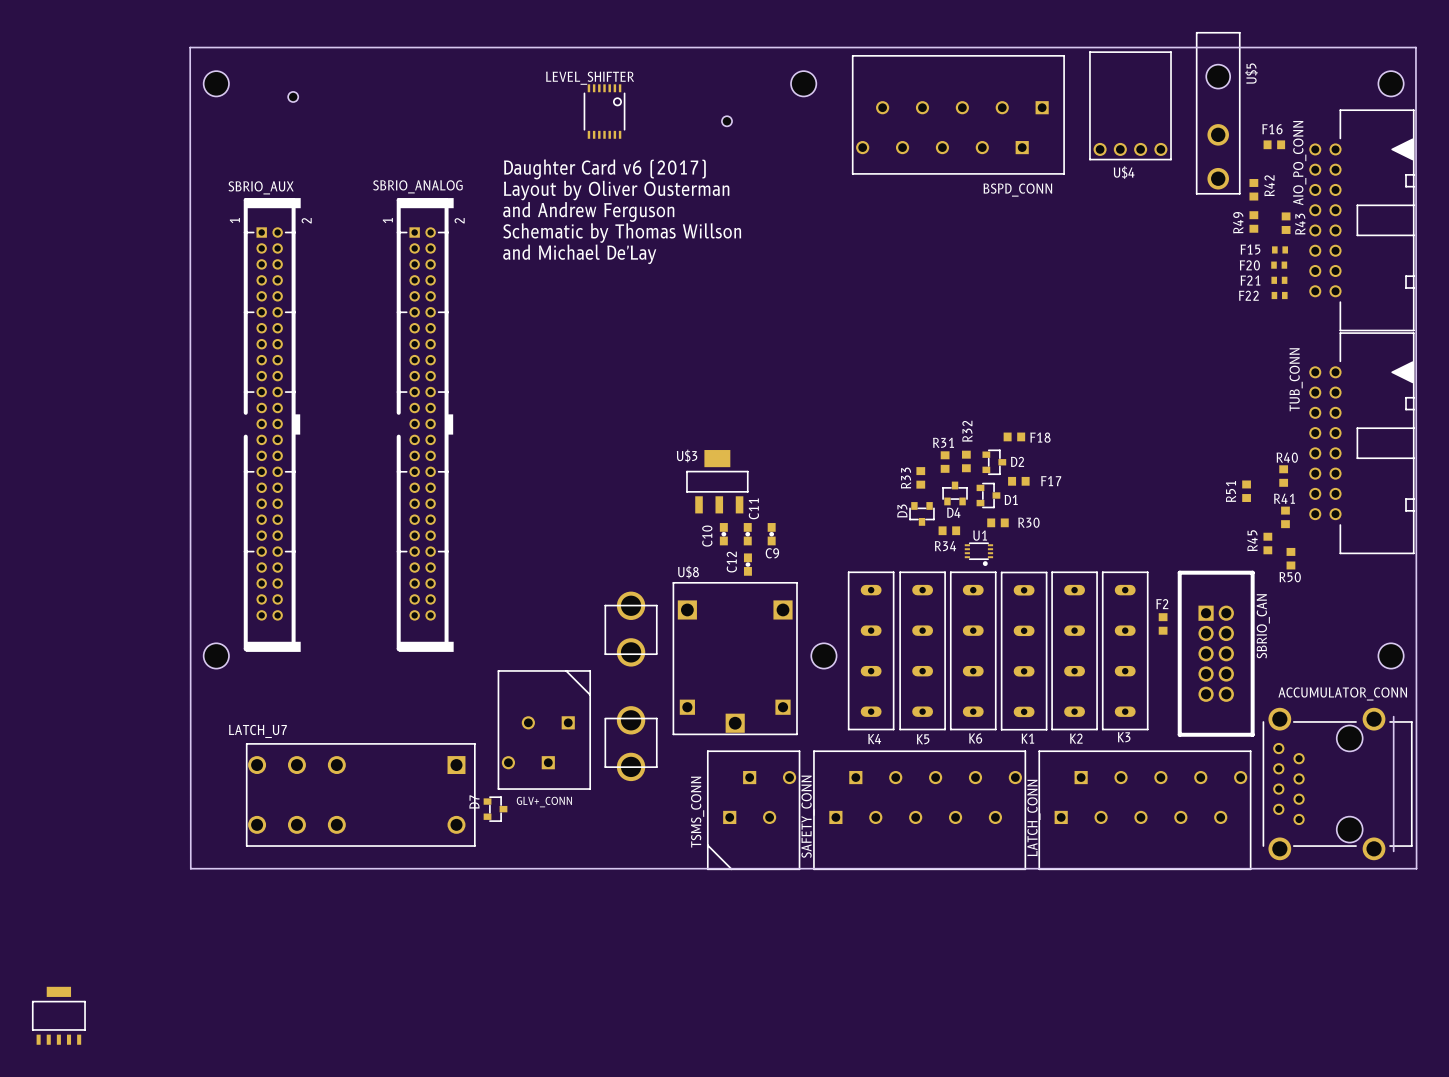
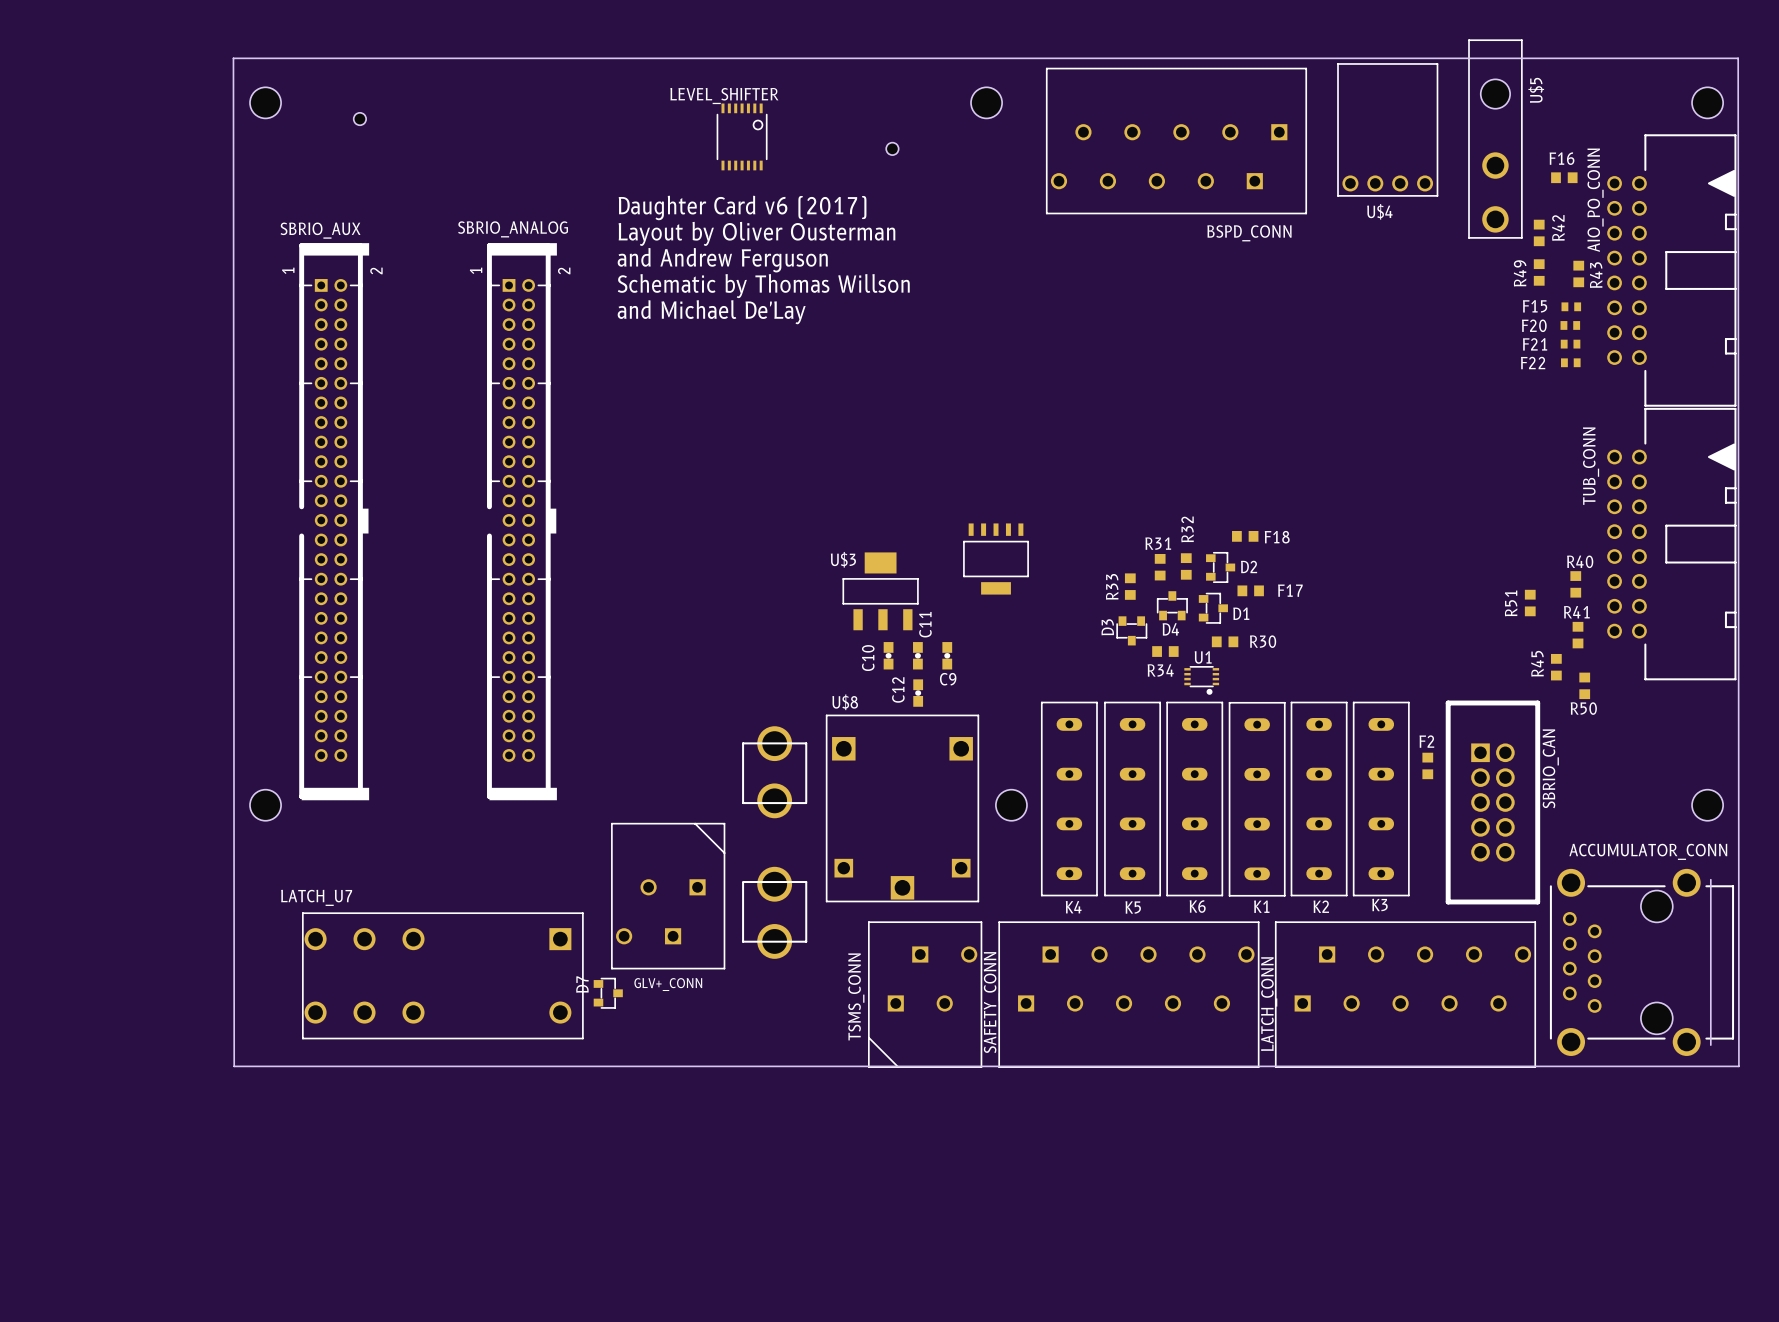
part: none -> (996, 559)
part: (58, 1015) -> none

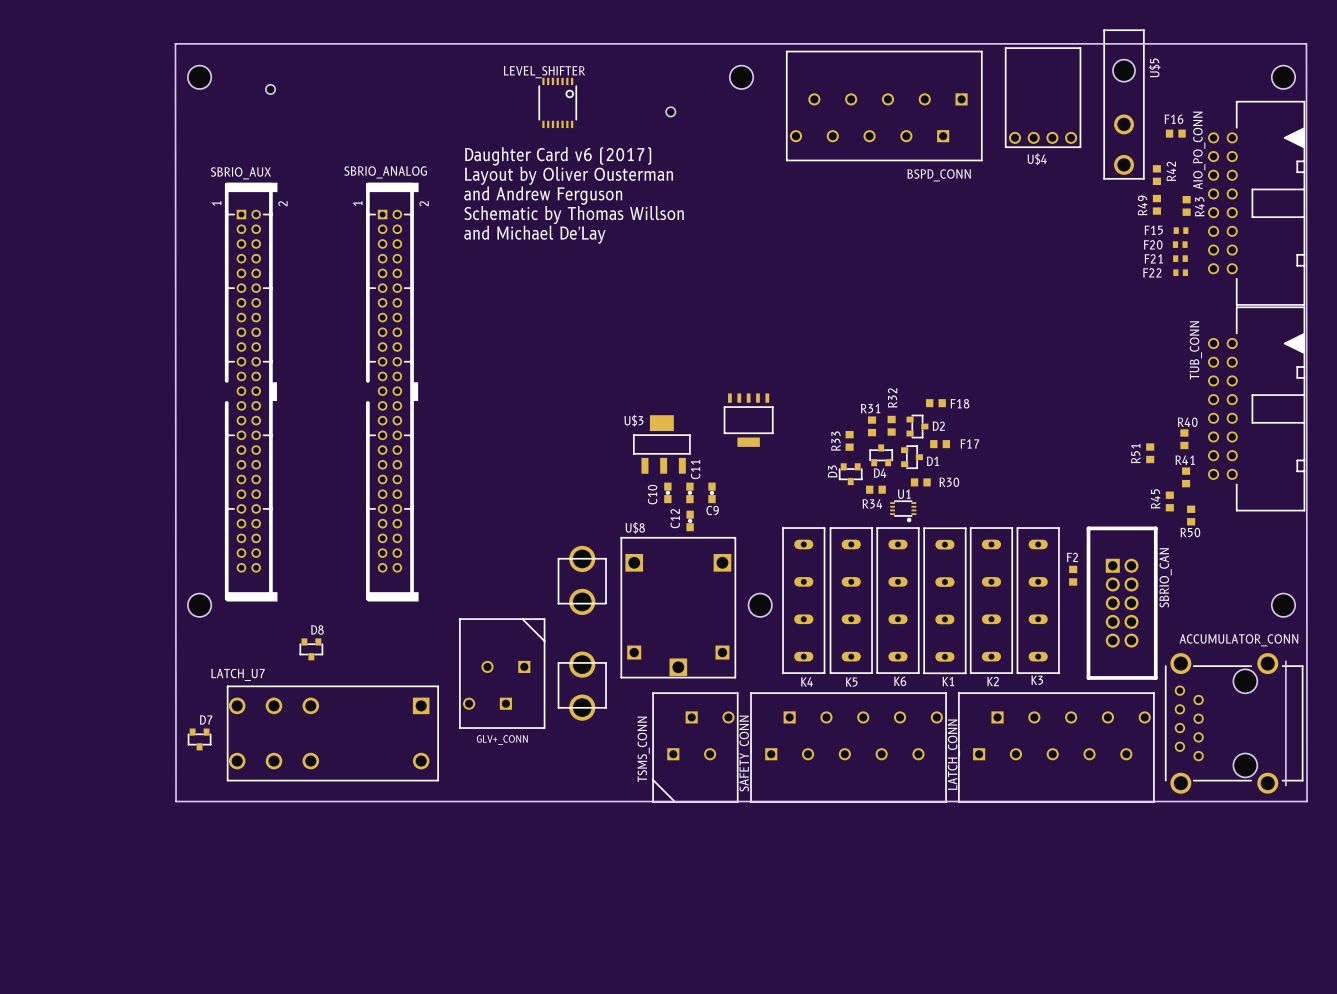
D8: none -> (311, 649)
D7 rotation: 0° (608, 993) -> 90° clockwise (199, 739)
D7 position: (608, 993) -> (199, 739)

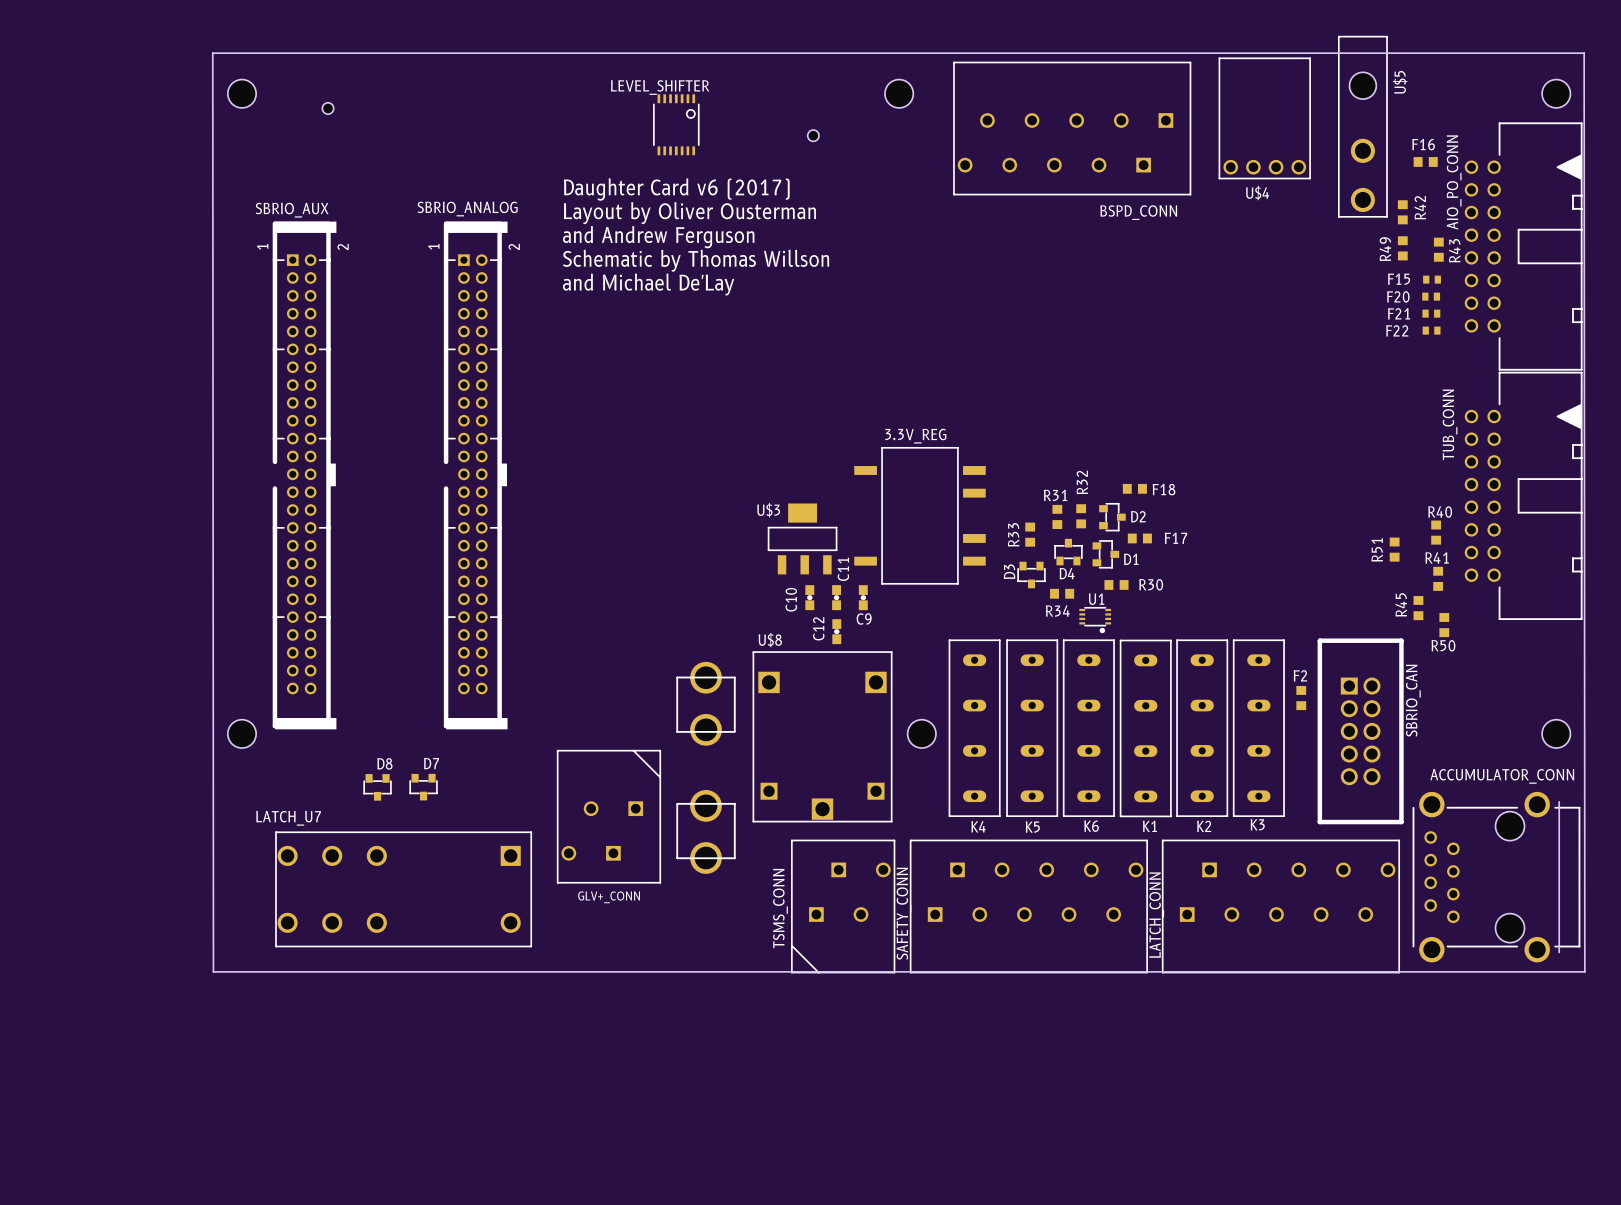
part: (748, 420) -> none
3.3V_REG: none -> (919, 515)
D7 position: (199, 739) -> (423, 787)

